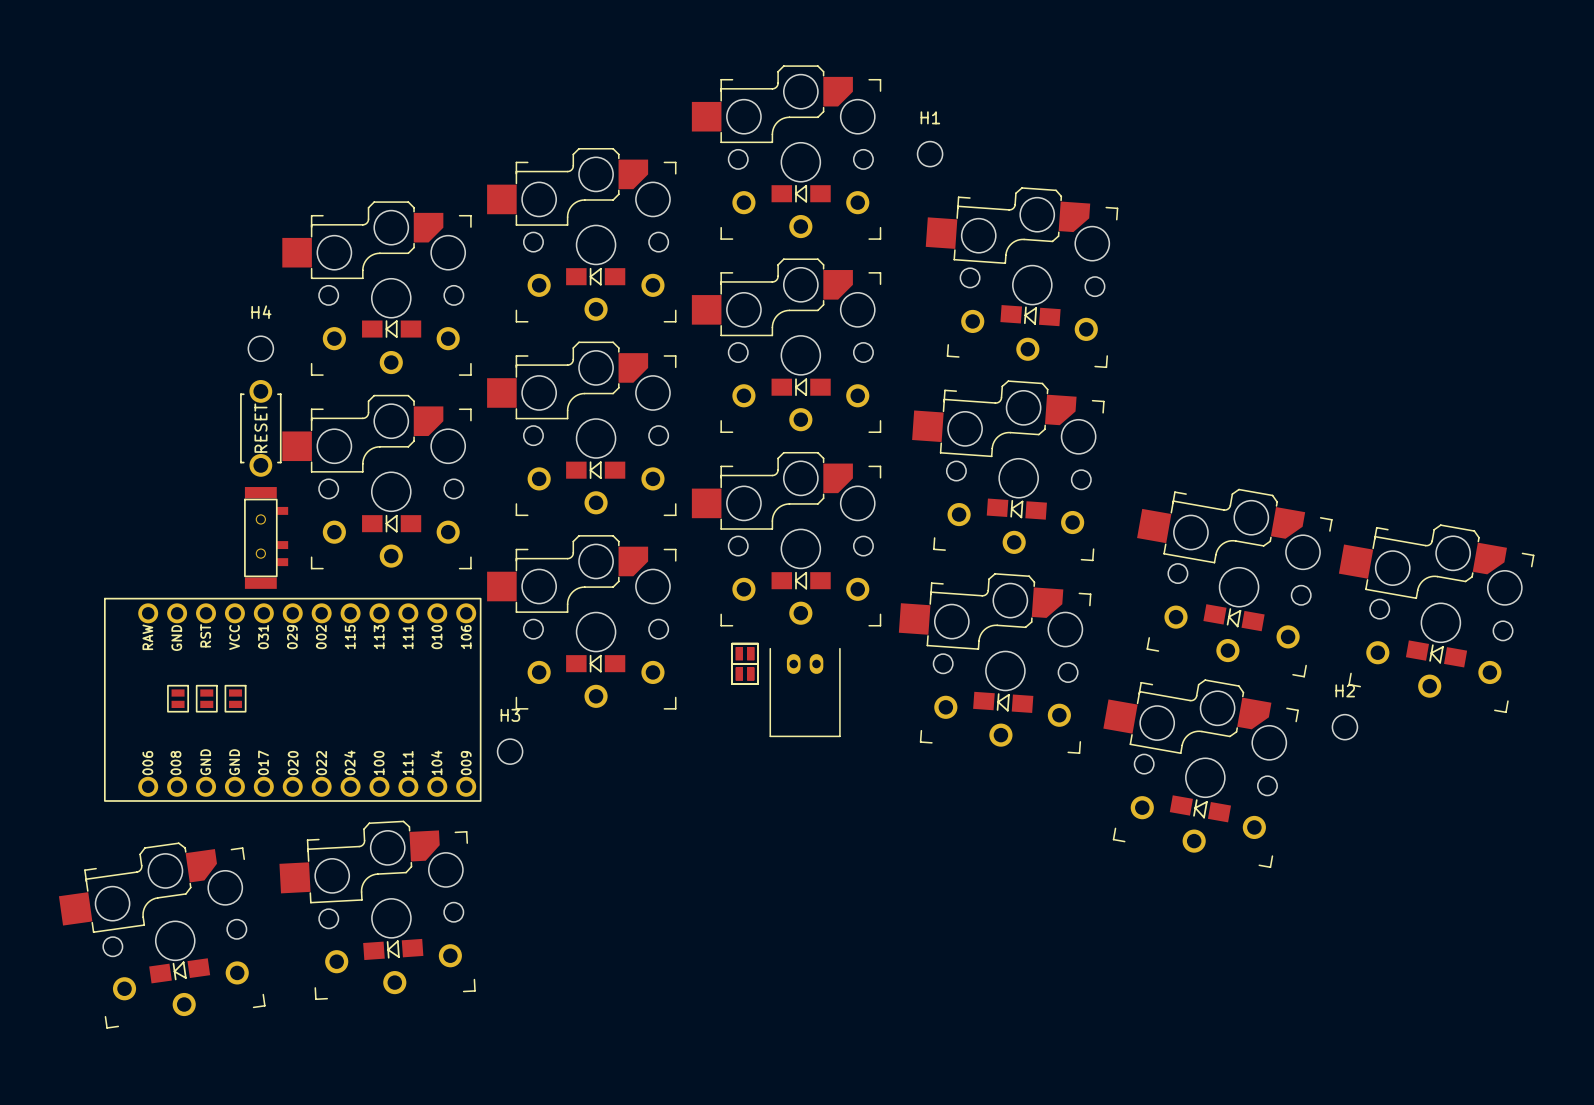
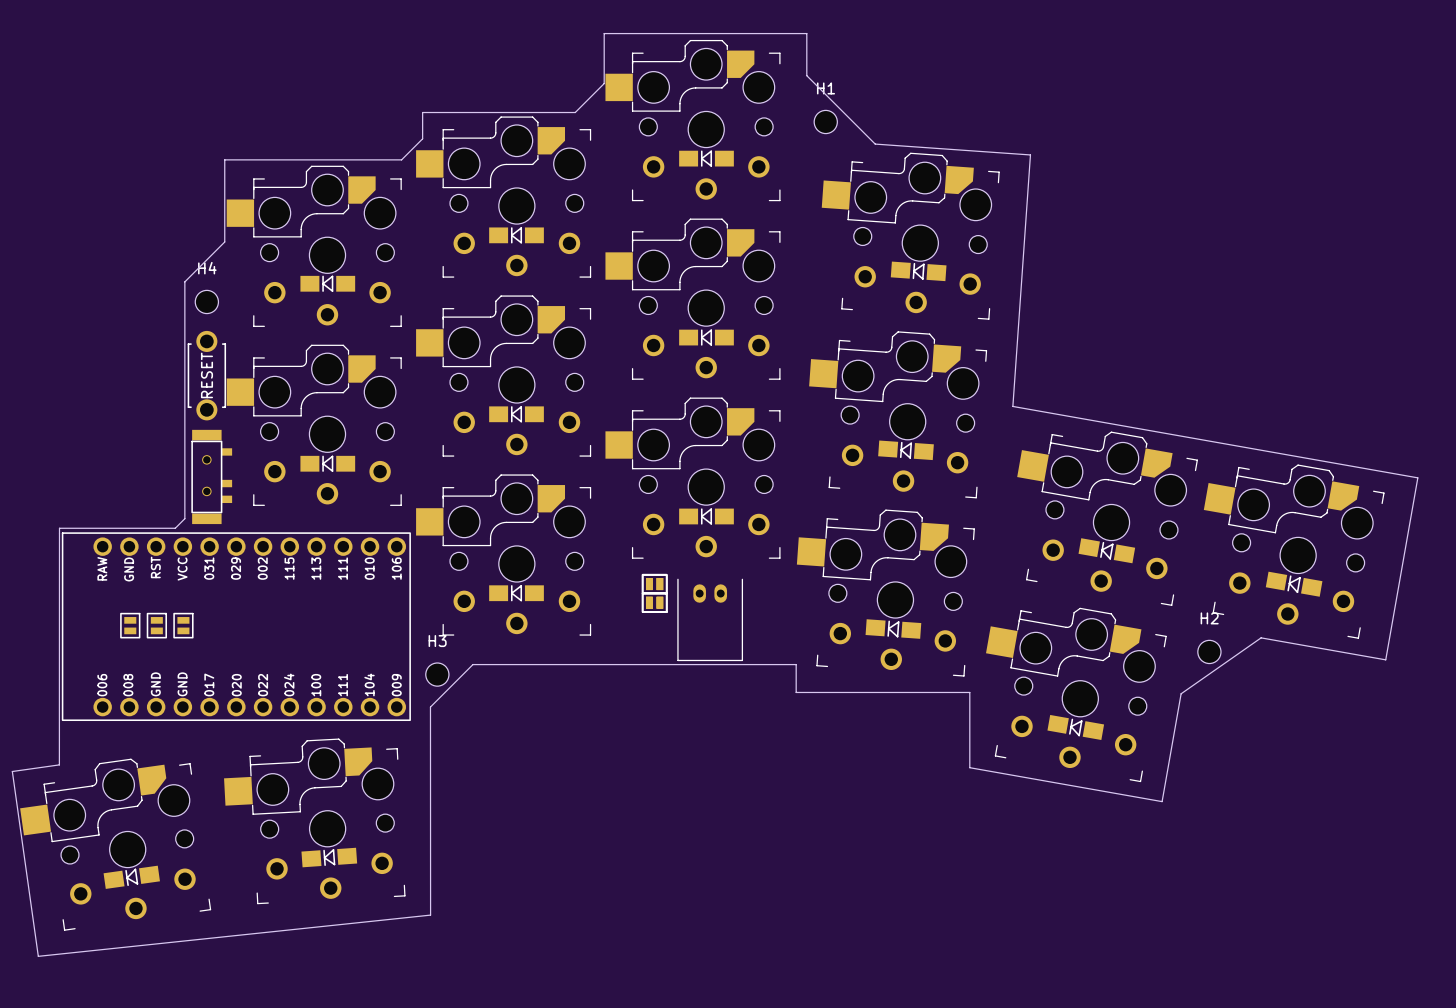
board edge: none -> (604, 33) (806, 33) (806, 75) (875, 144) (1030, 154) (1012, 406) (1417, 477) (1385, 659) (1261, 637) (1181, 693) (1162, 801) (969, 767) (969, 692) (796, 692) (796, 664) (472, 664) (430, 707) (430, 915) (38, 956) (12, 771) (59, 764) (59, 528) (175, 528) (184, 518) (184, 281) (224, 241) (224, 159) (401, 159) (422, 138) (422, 112) (575, 112) (604, 83) (604, 33)

